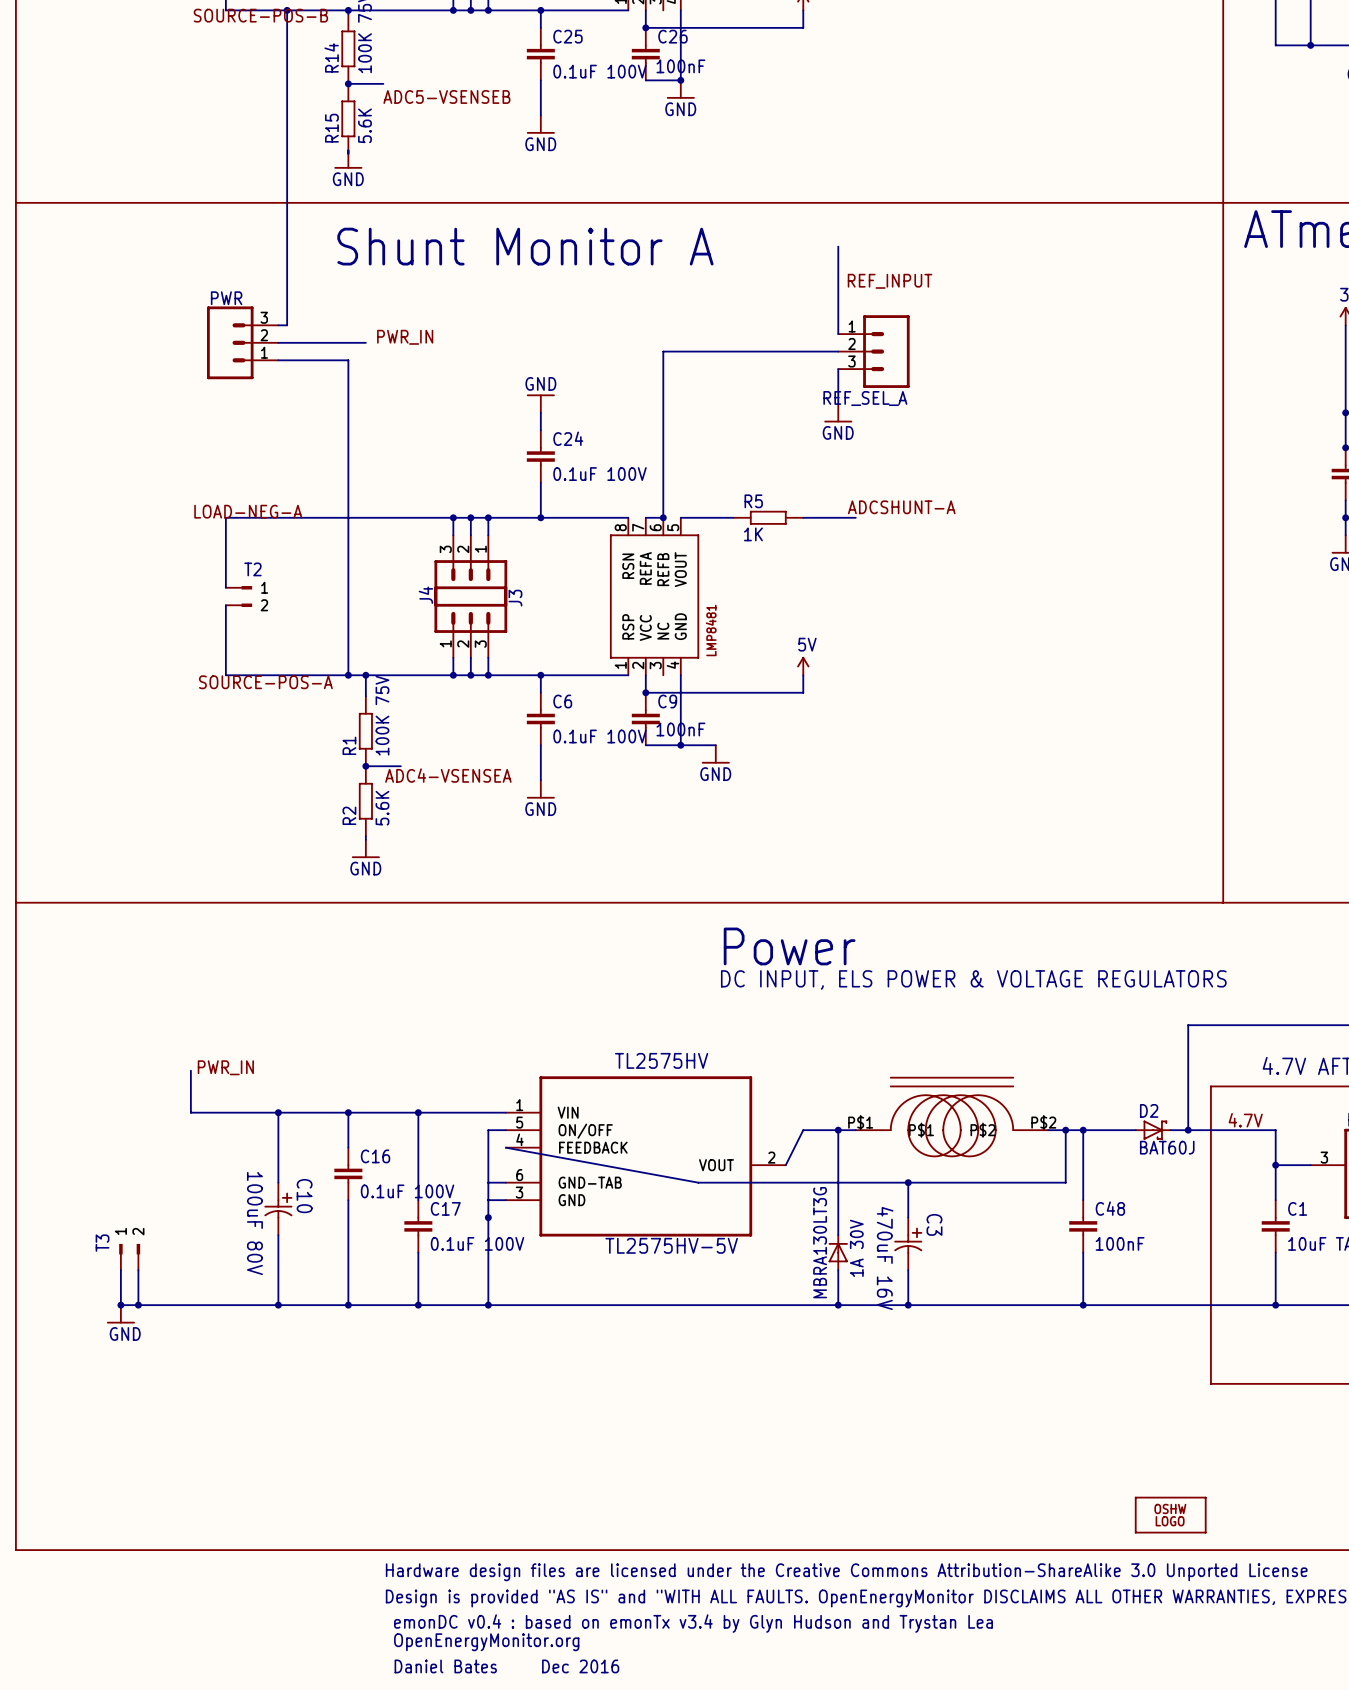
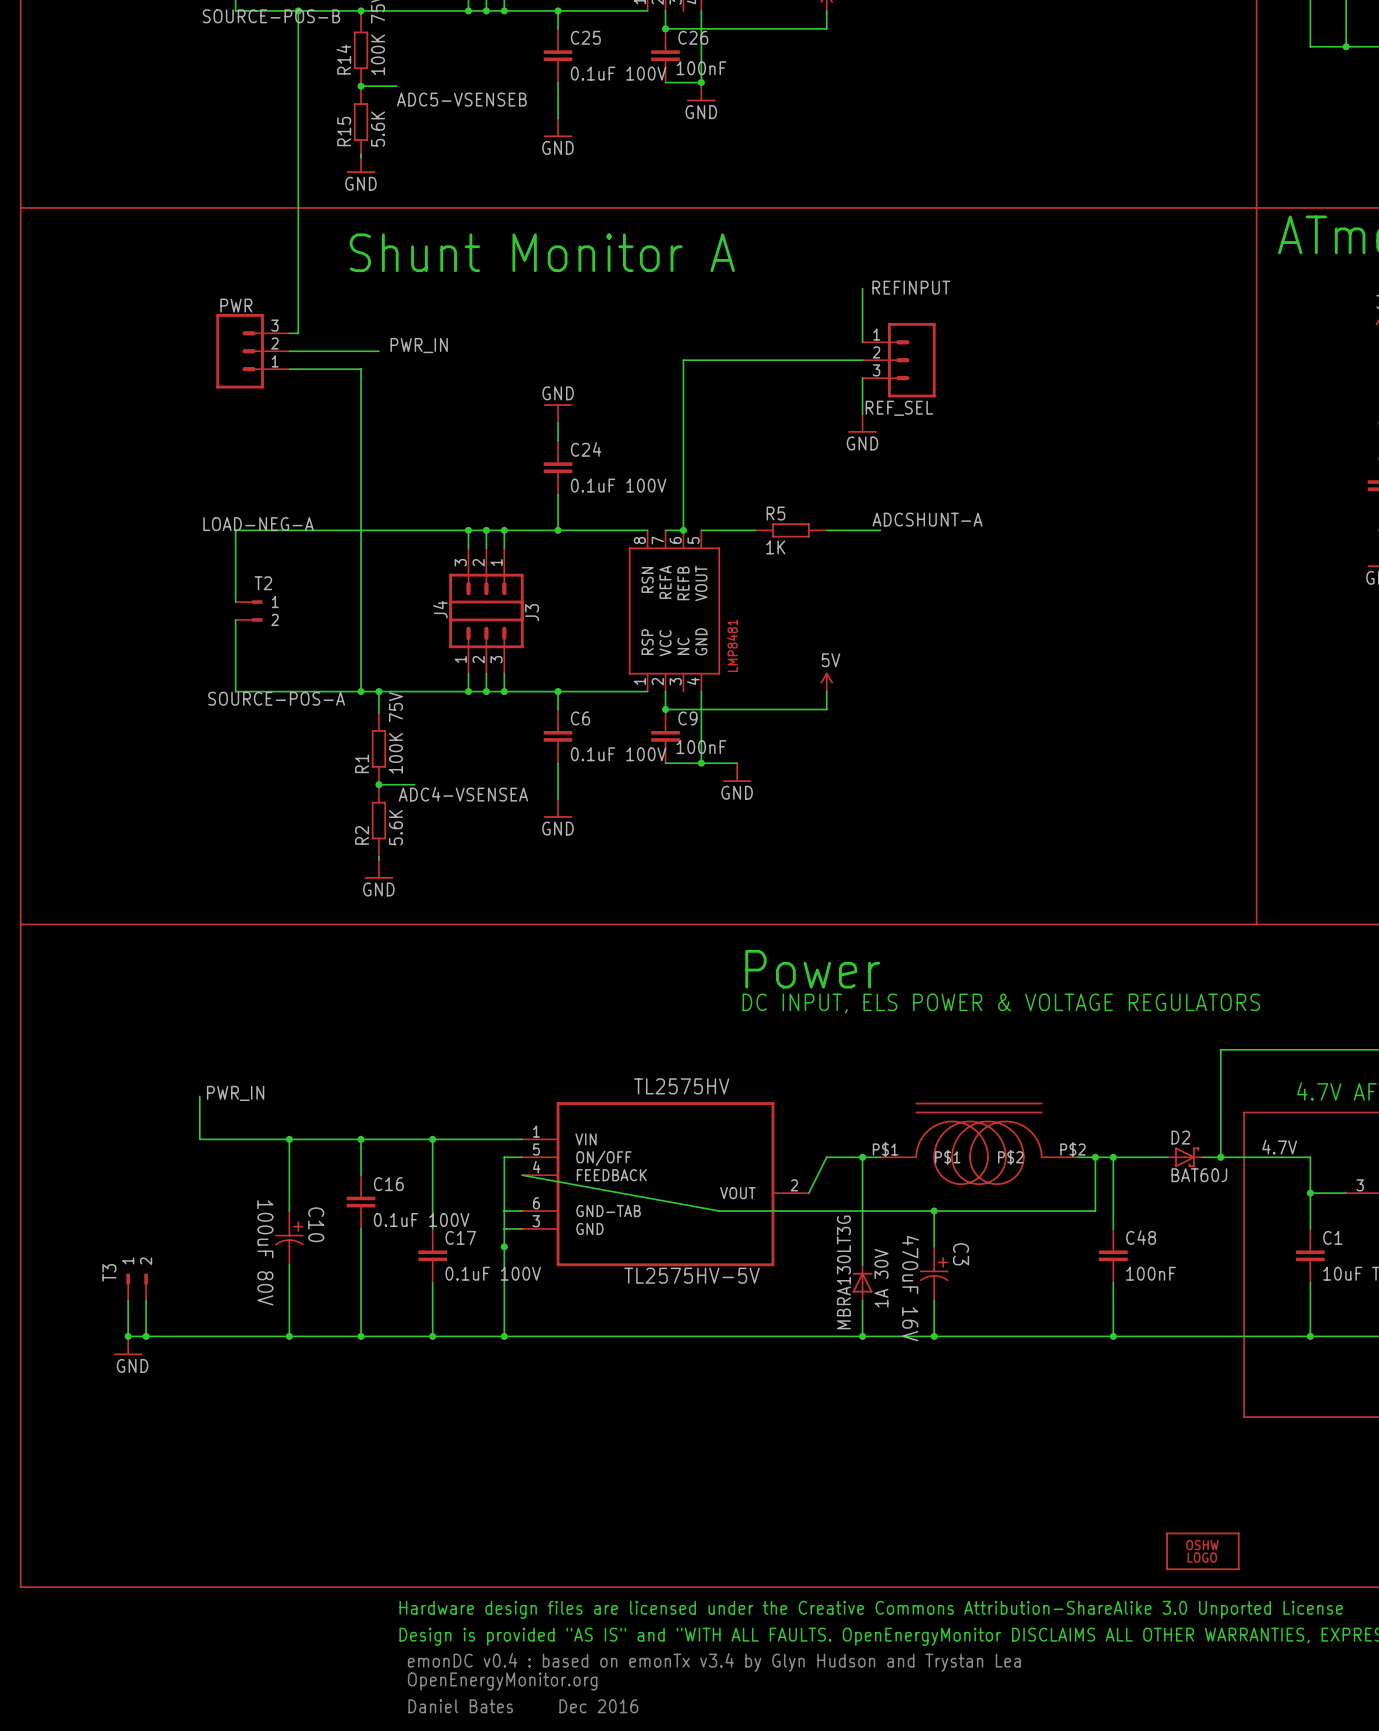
wire: (838, 246) (838, 281) -> none
label: REF_INPUT (890, 281) -> REFINPUT (911, 287)
REF_SEL_A name: REF_SEL_A (865, 398) -> REF_SEL (899, 408)

